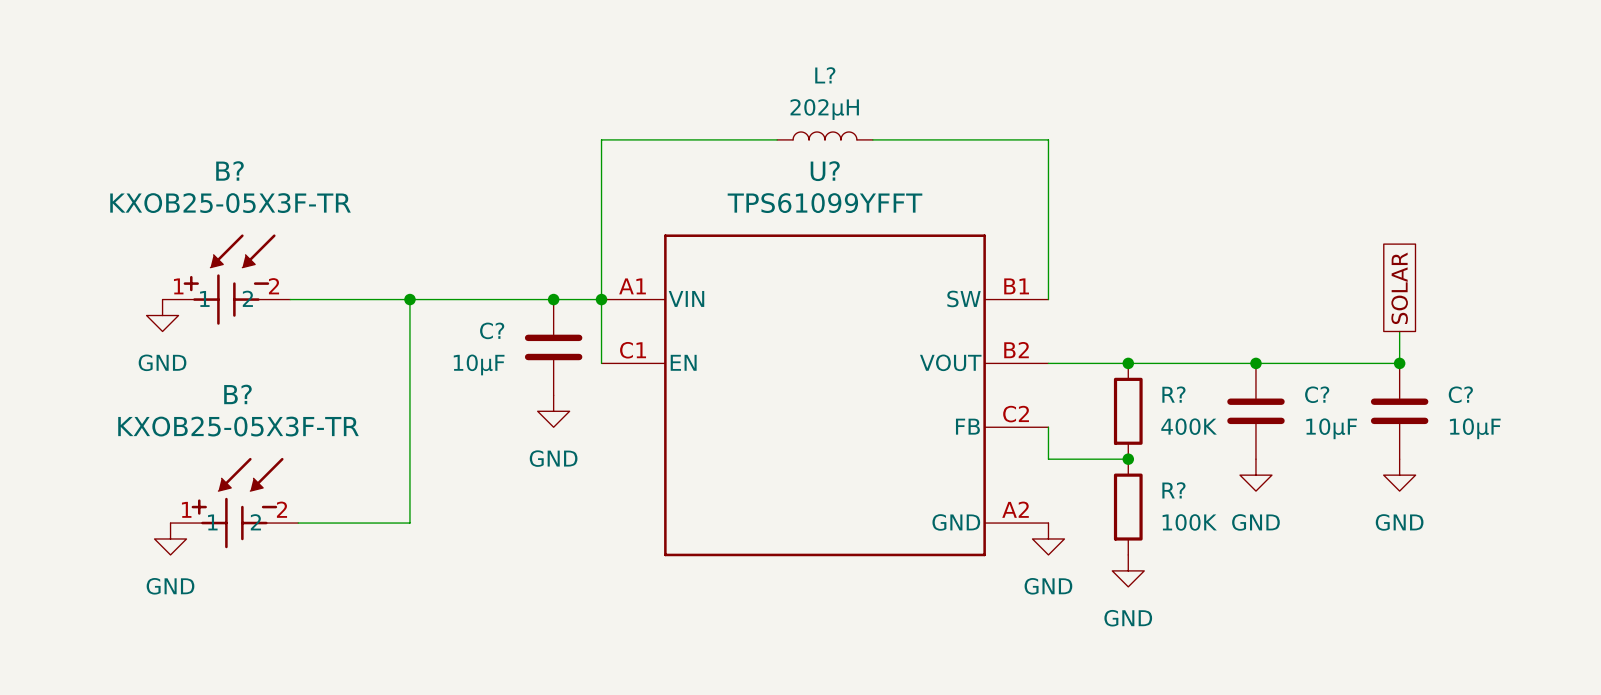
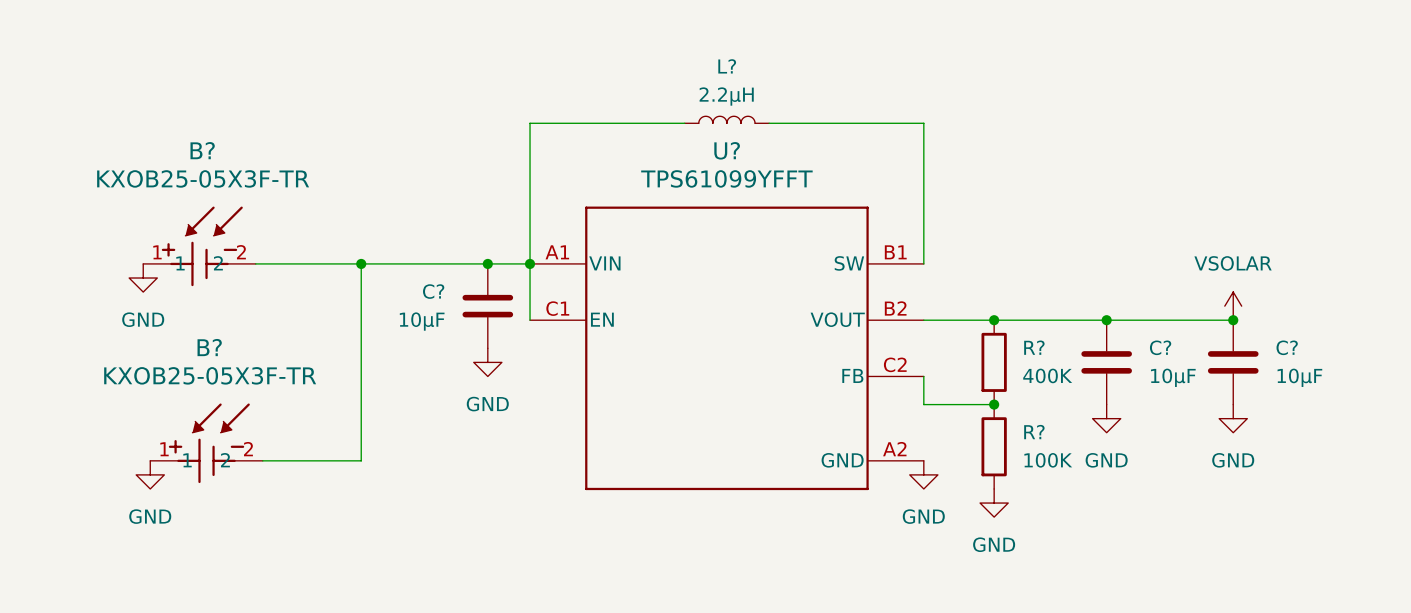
L? value: 202µH (824, 109) -> 2.2µH (726, 96)
global label: SOLAR (1399, 288) -> none
power symbol: none -> VSOLAR (1233, 306)

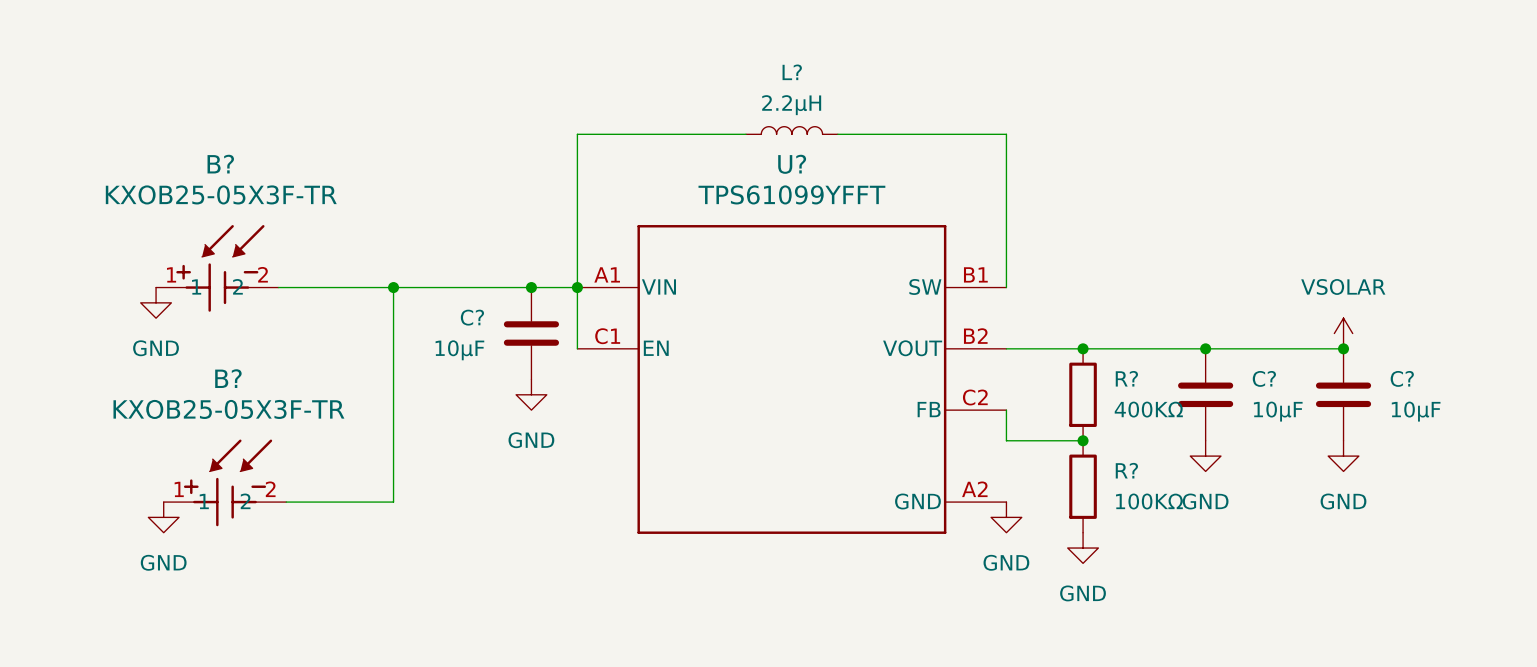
R? value: 400K (1047, 375) -> 400KΩ (1148, 409)
R? value: 100K (1048, 460) -> 100KΩ (1149, 501)

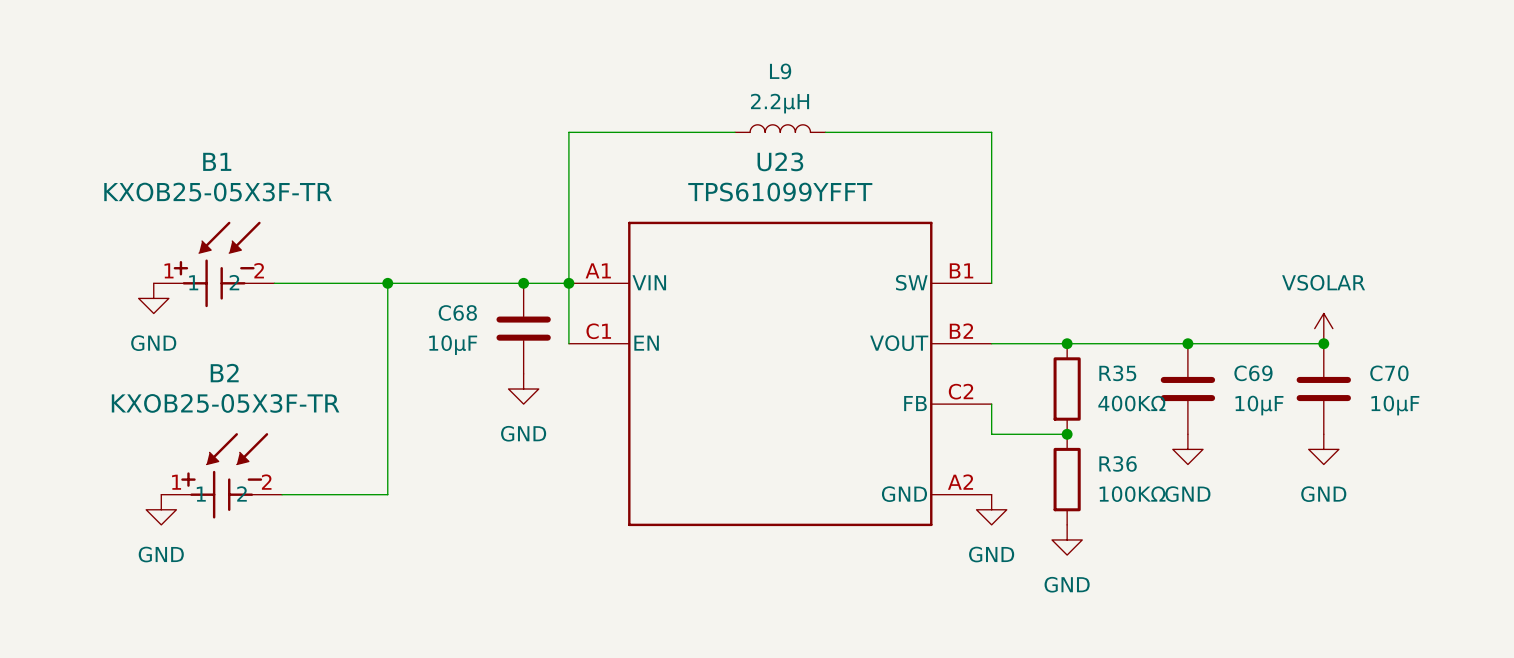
L? name: L? (792, 72) -> L9 (780, 71)
B? name: B? (220, 164) -> B1 (217, 161)
U? name: U? (792, 164) -> U23 (780, 161)
C? name: C? (472, 317) -> C68 (457, 312)
B? name: B? (228, 378) -> B2 (224, 373)
R? name: R? (1126, 378) -> R35 (1117, 373)
C? name: C? (1264, 378) -> C69 (1253, 373)
C? name: C? (1402, 378) -> C70 (1389, 373)
R? name: R? (1126, 470) -> R36 (1118, 463)

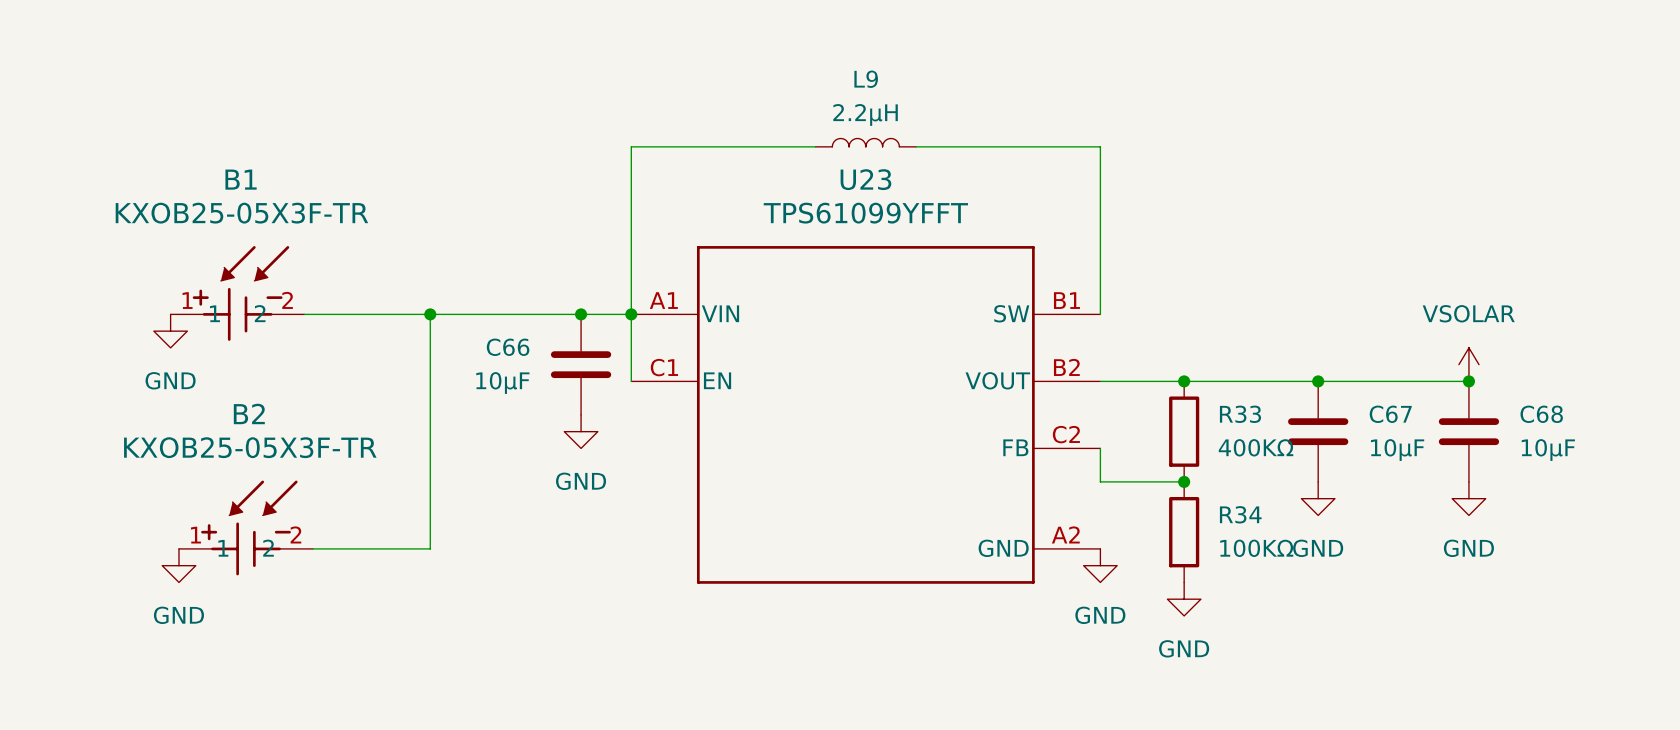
C68 name: C68 (457, 312) -> C66 (508, 347)
R35 name: R35 (1117, 373) -> R33 (1240, 414)
C69 name: C69 (1253, 373) -> C67 (1390, 414)
C70 name: C70 (1389, 373) -> C68 (1541, 414)
R36 name: R36 (1118, 463) -> R34 (1240, 514)

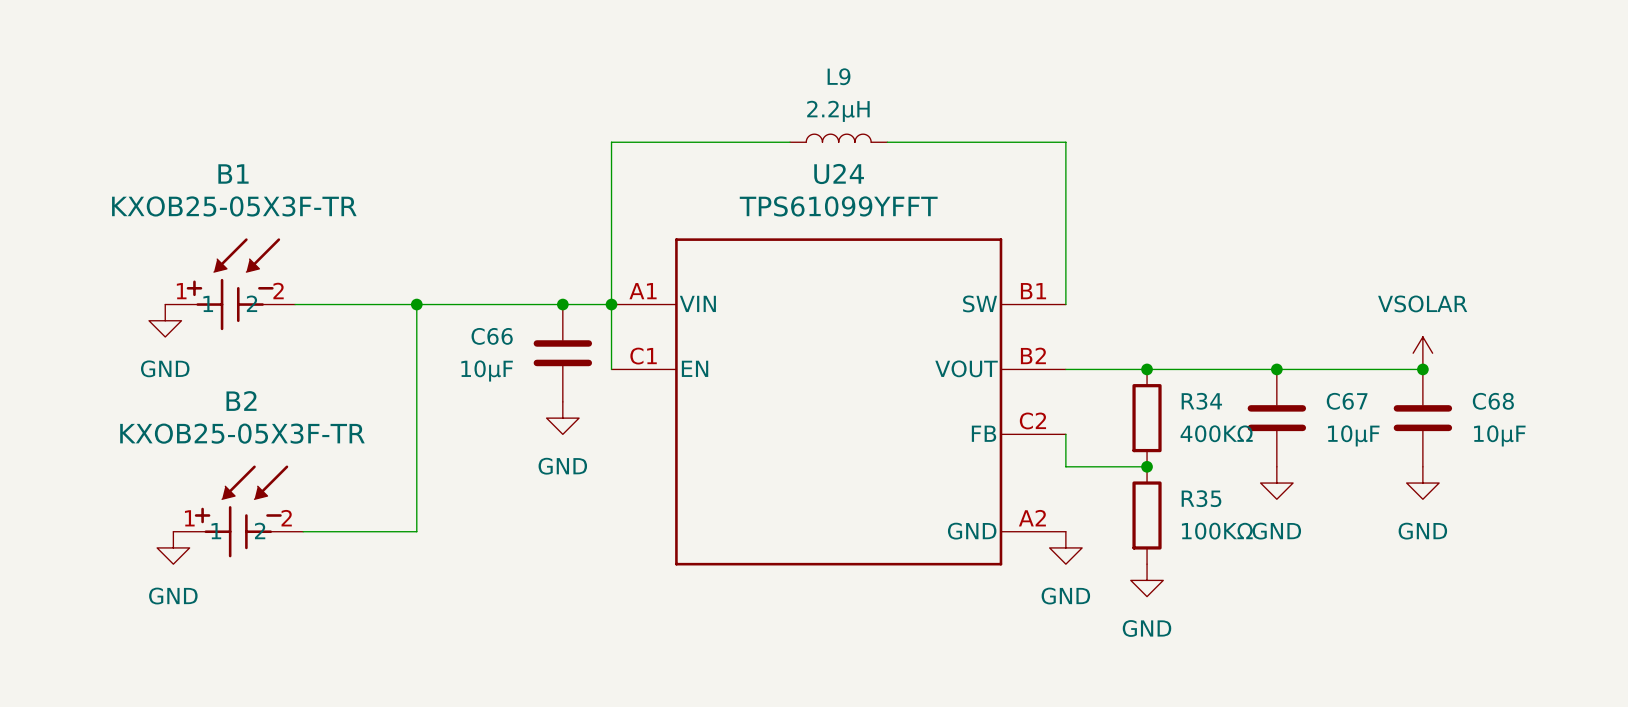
U23 name: U23 (865, 179) -> U24 (839, 174)
R33 name: R33 (1240, 414) -> R34 (1201, 401)
R34 name: R34 (1240, 514) -> R35 (1201, 498)

